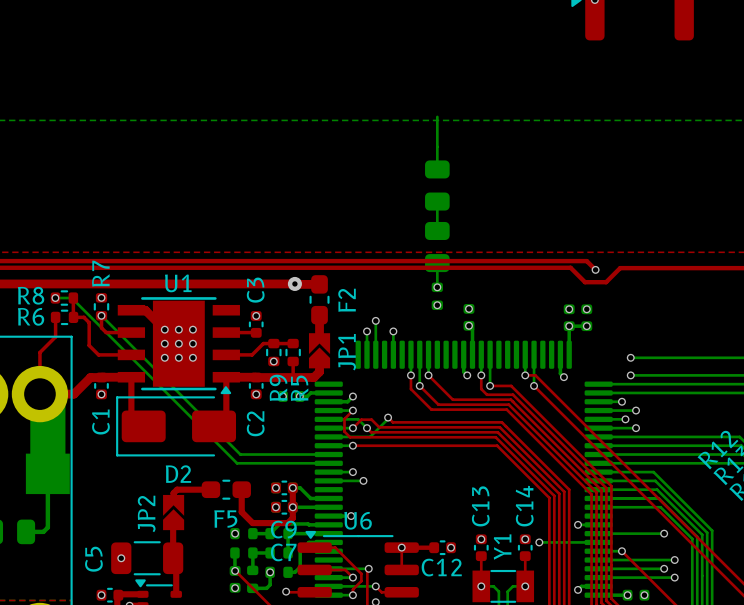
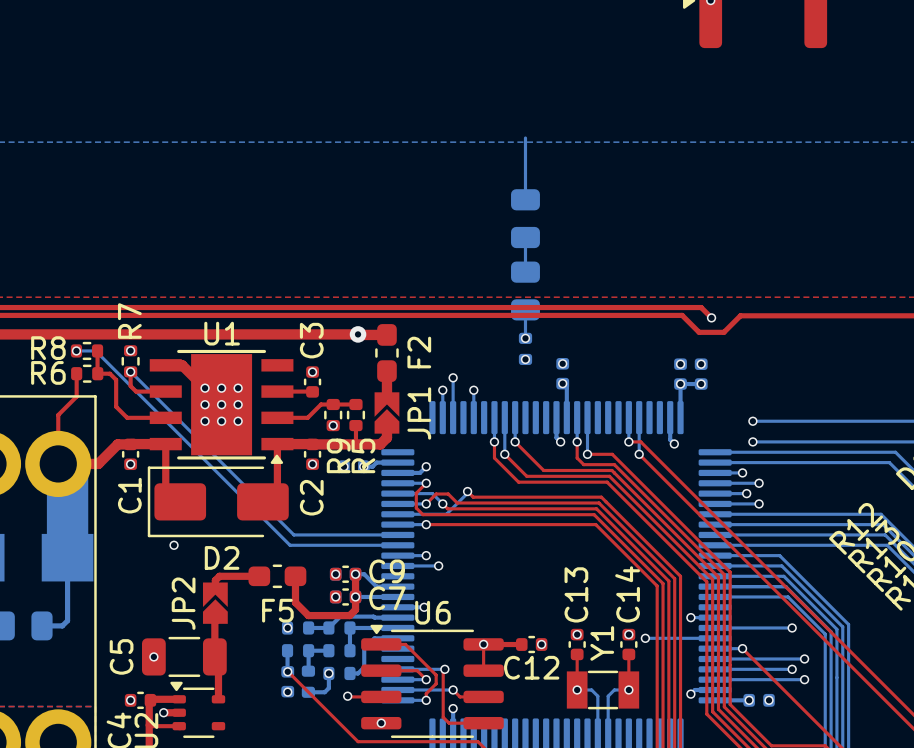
via: none -> (174, 545)
C9 name position: C9 (283, 529) -> C9 (386, 571)
C7 name position: C7 (283, 552) -> C7 (387, 598)

